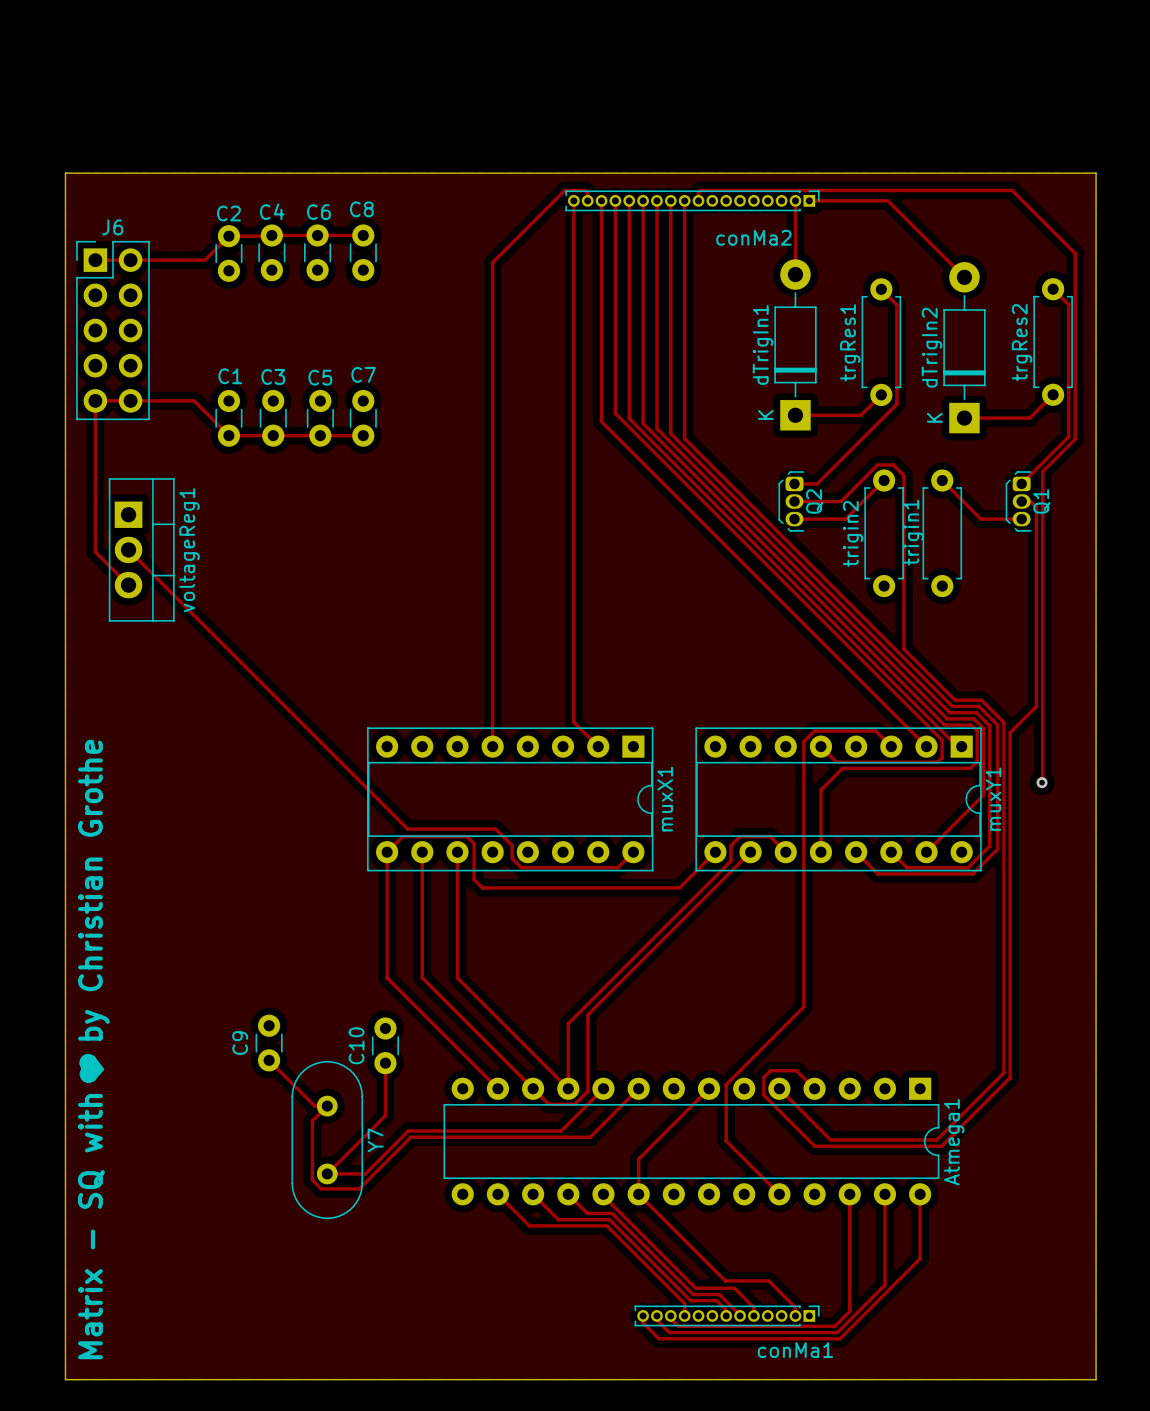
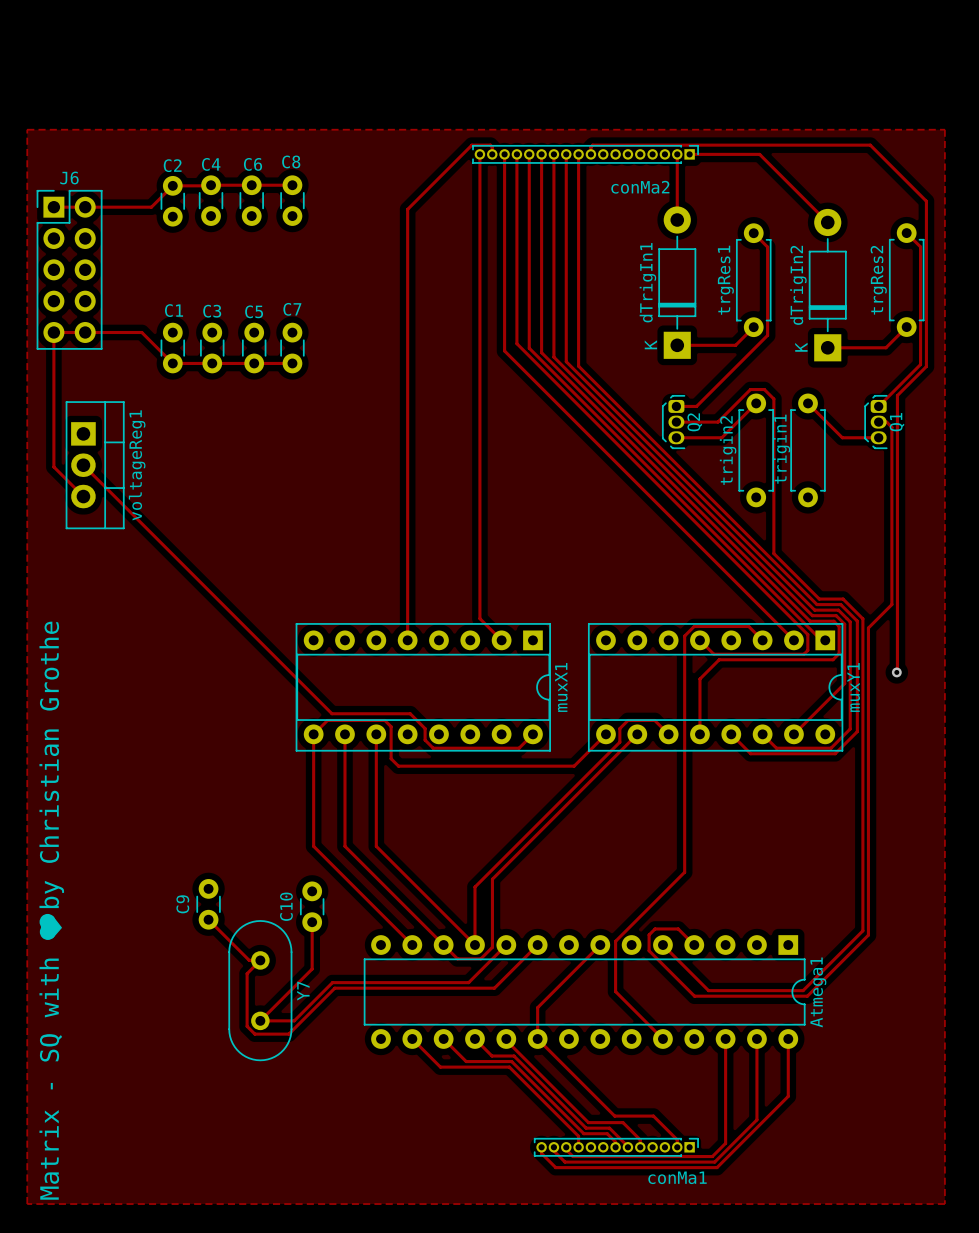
board edge: (65, 173) (1096, 173) (1096, 1379) (65, 1379) (65, 173) -> none

